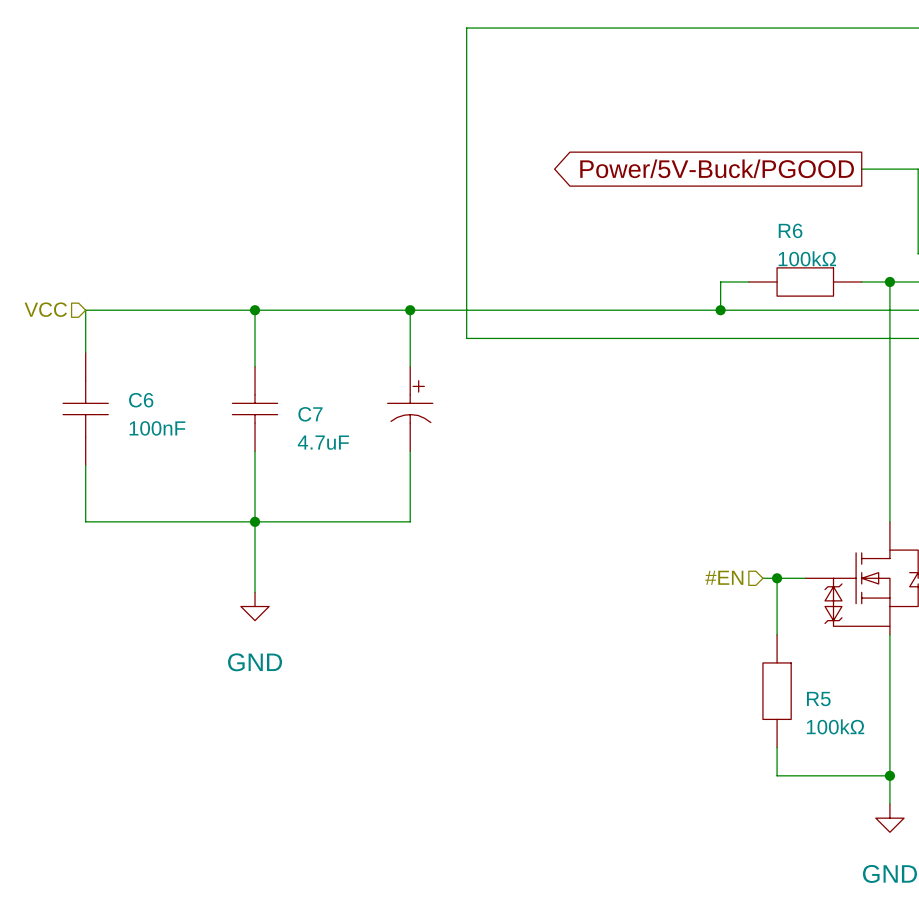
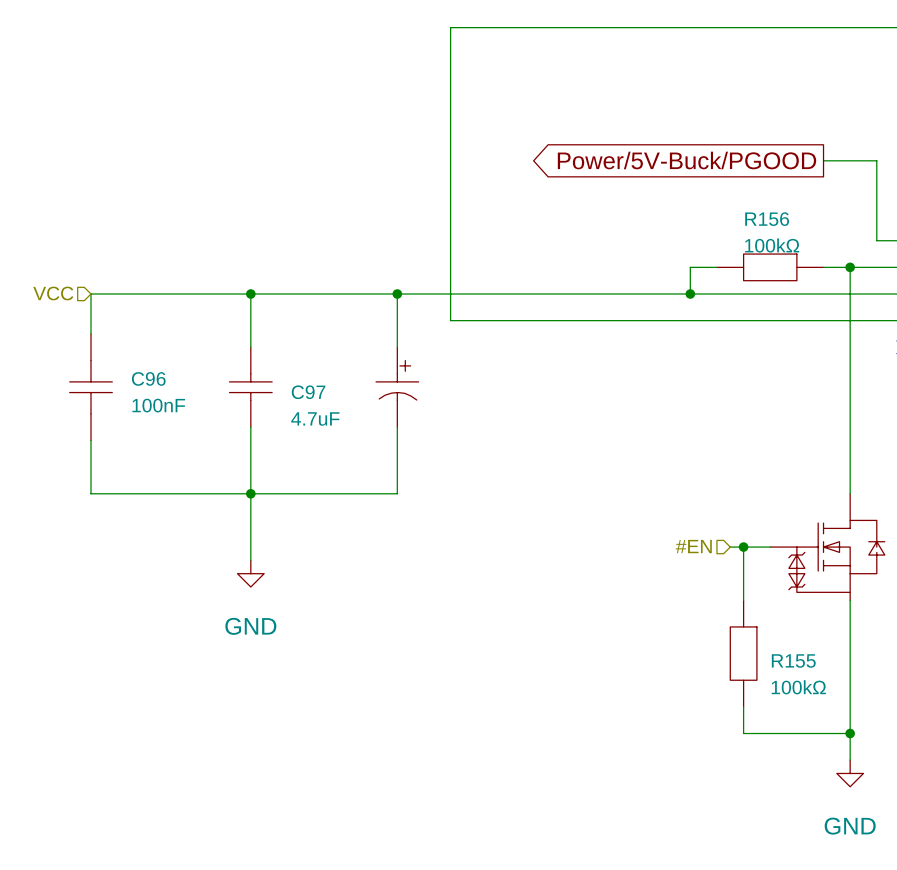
R6 name: R6 (790, 230) -> R156 (767, 219)
C6 name: C6 (141, 400) -> C96 (148, 378)
C7 name: C7 (310, 414) -> C97 (308, 392)
R5 name: R5 (818, 699) -> R155 (793, 660)

